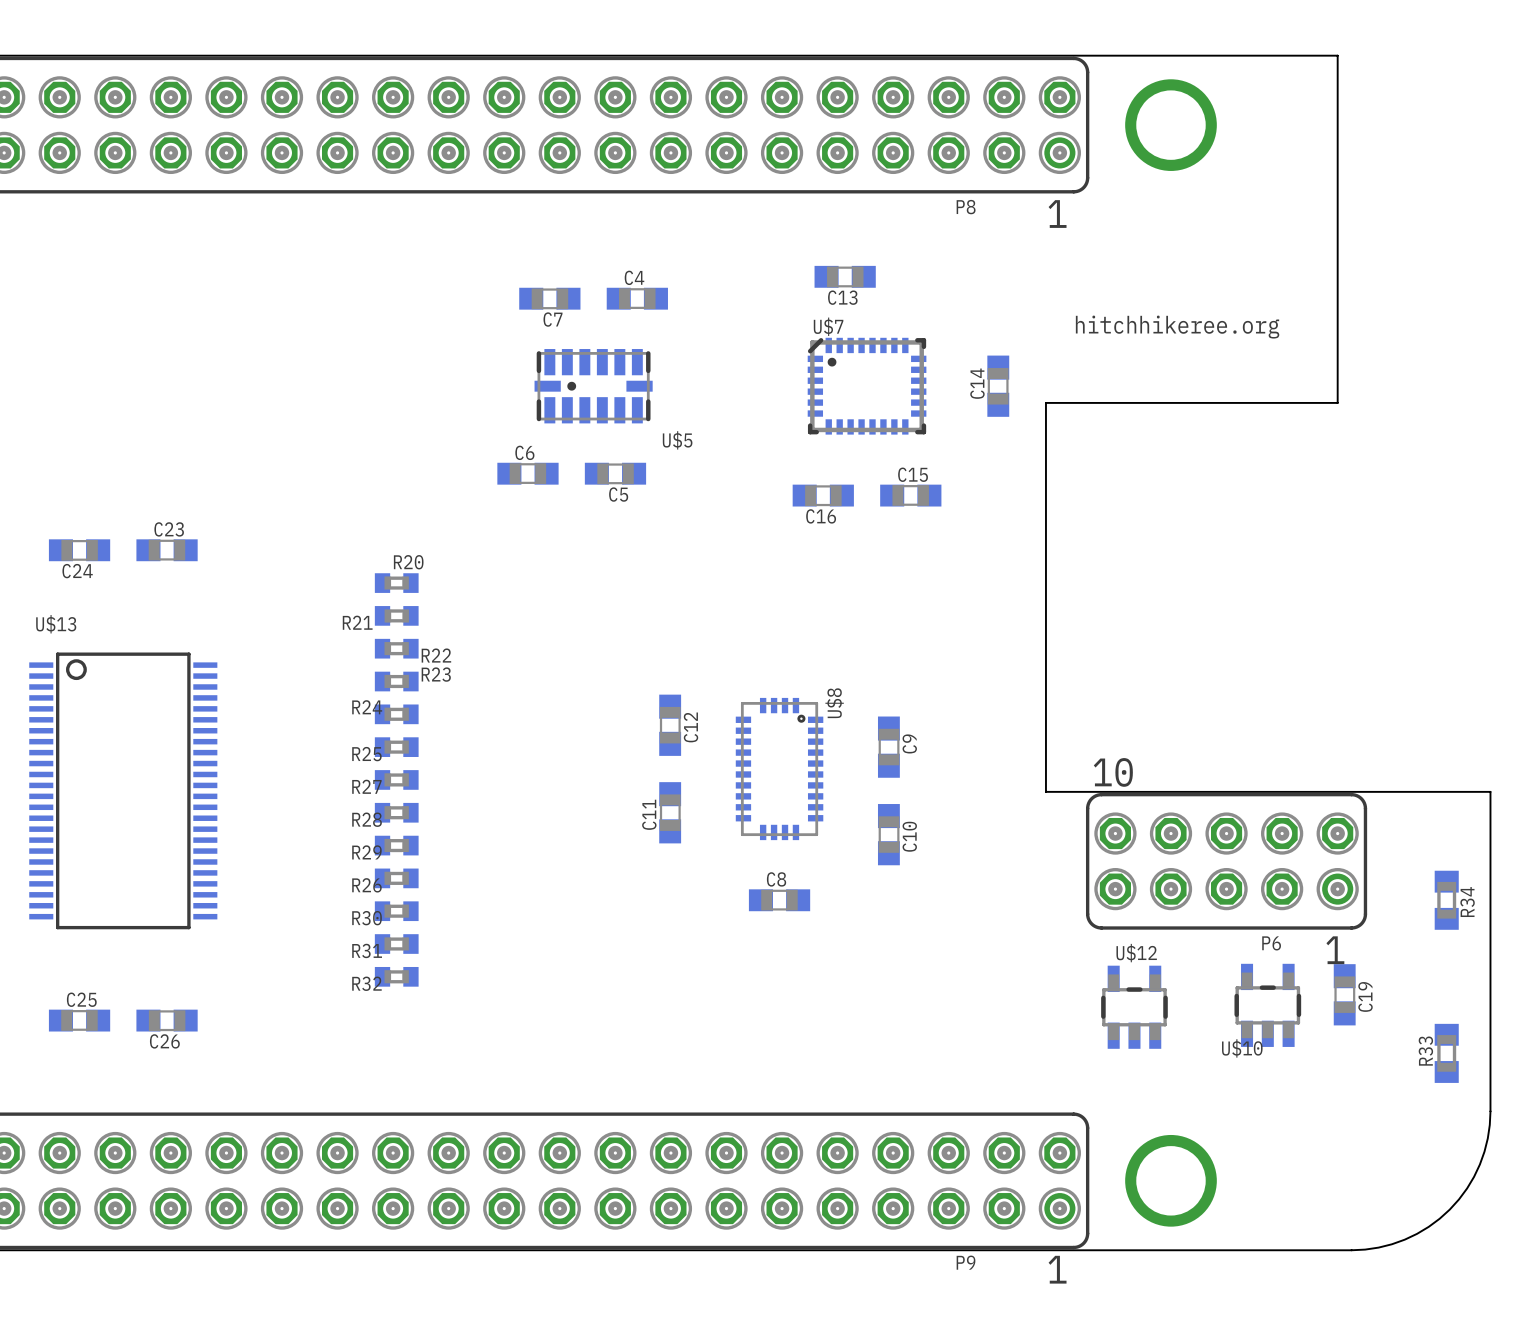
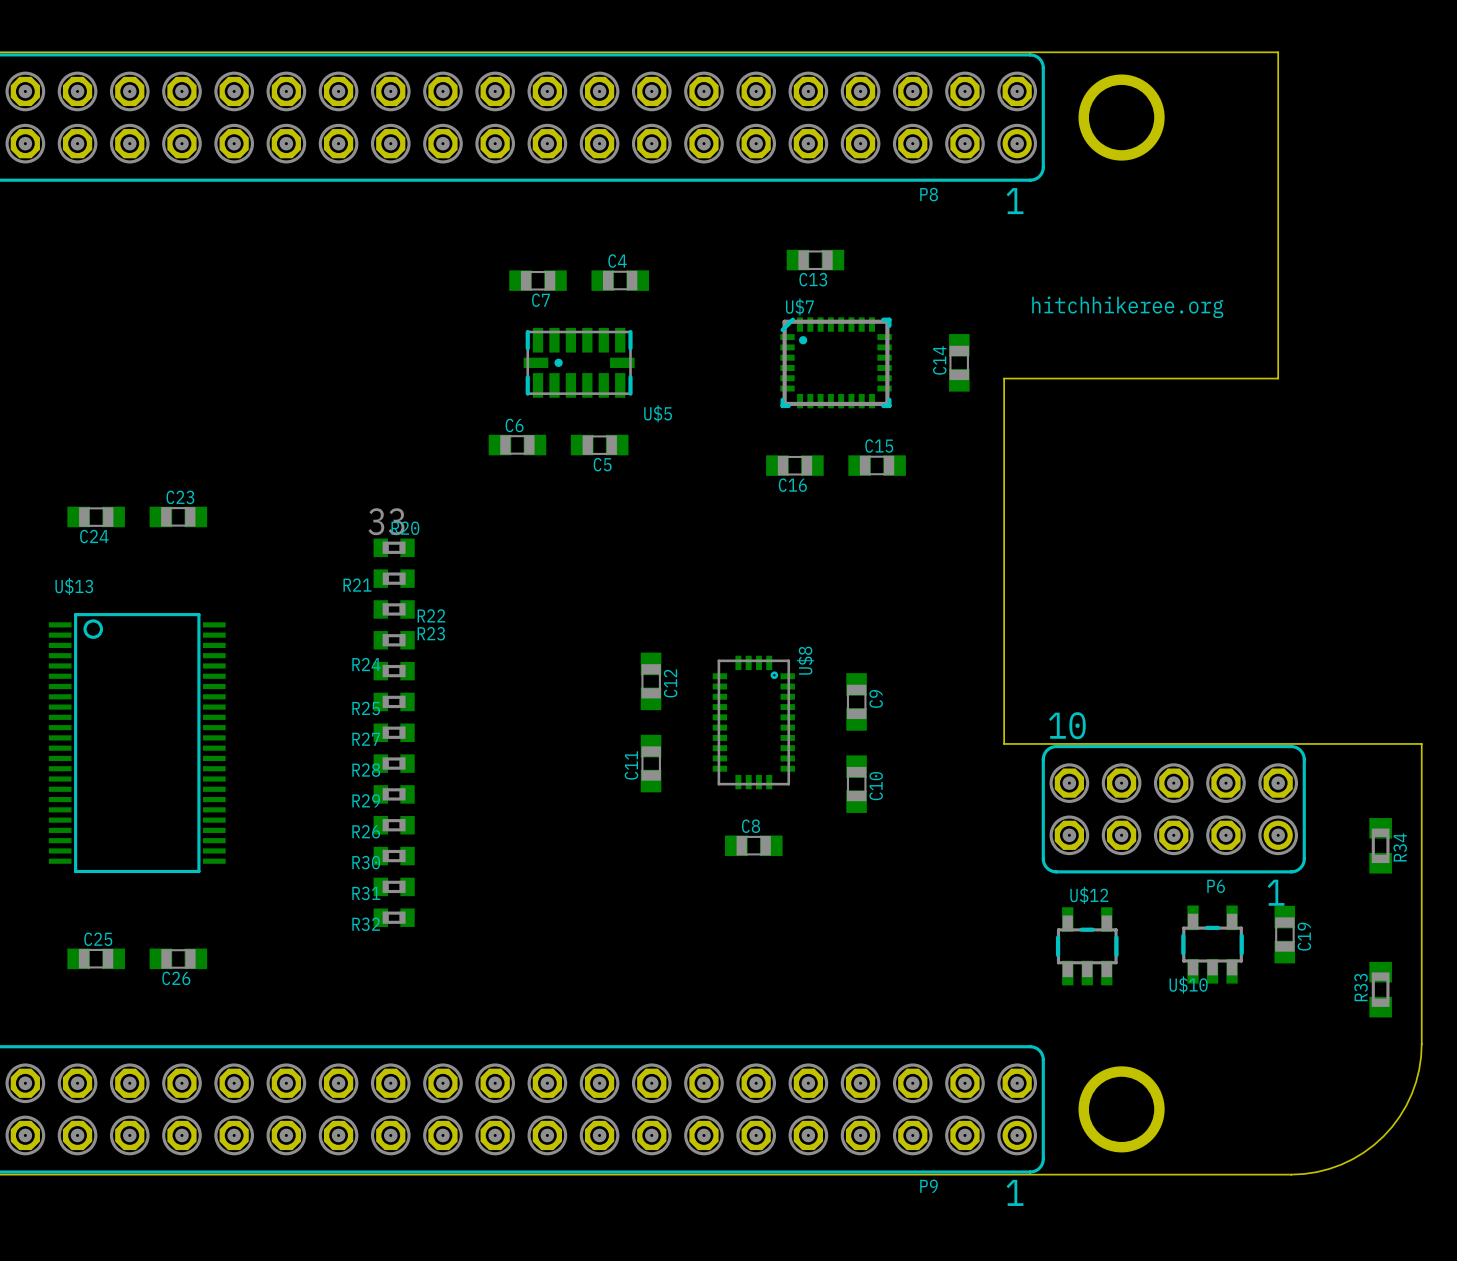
R20 value: none -> 33 (386, 521)

